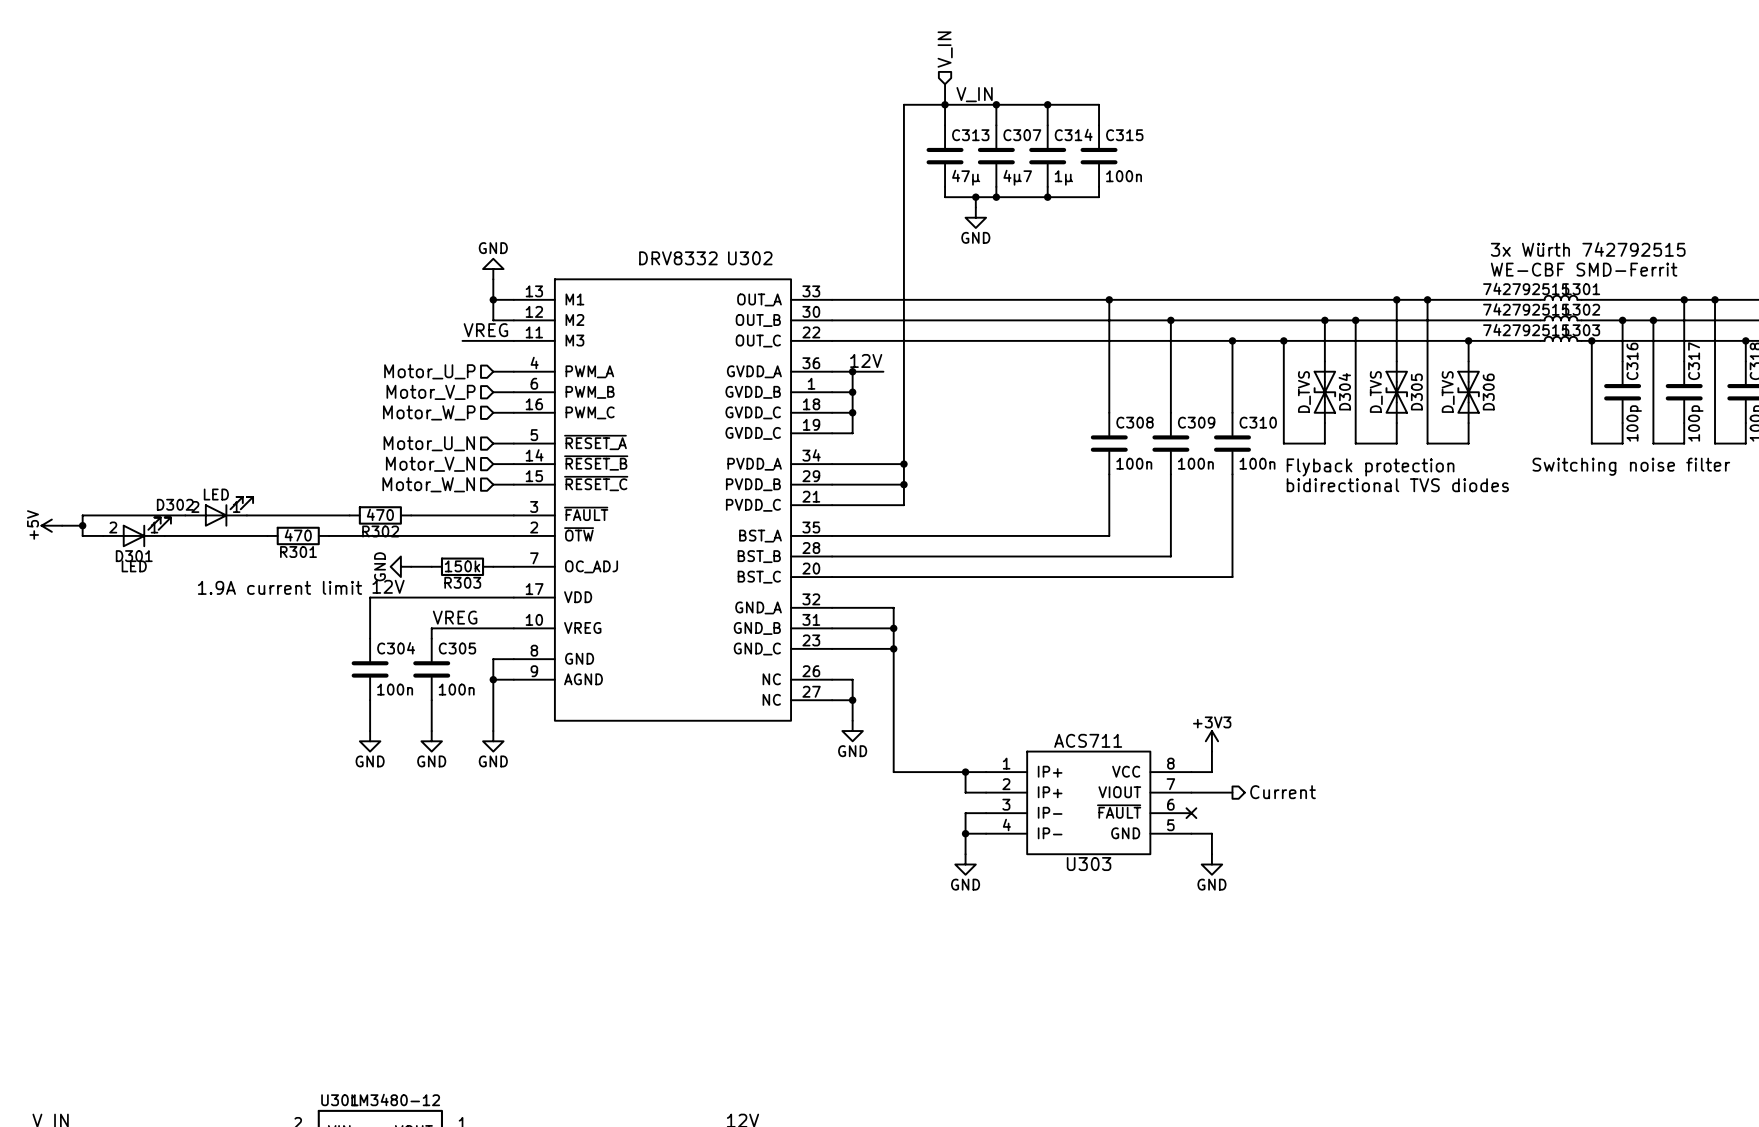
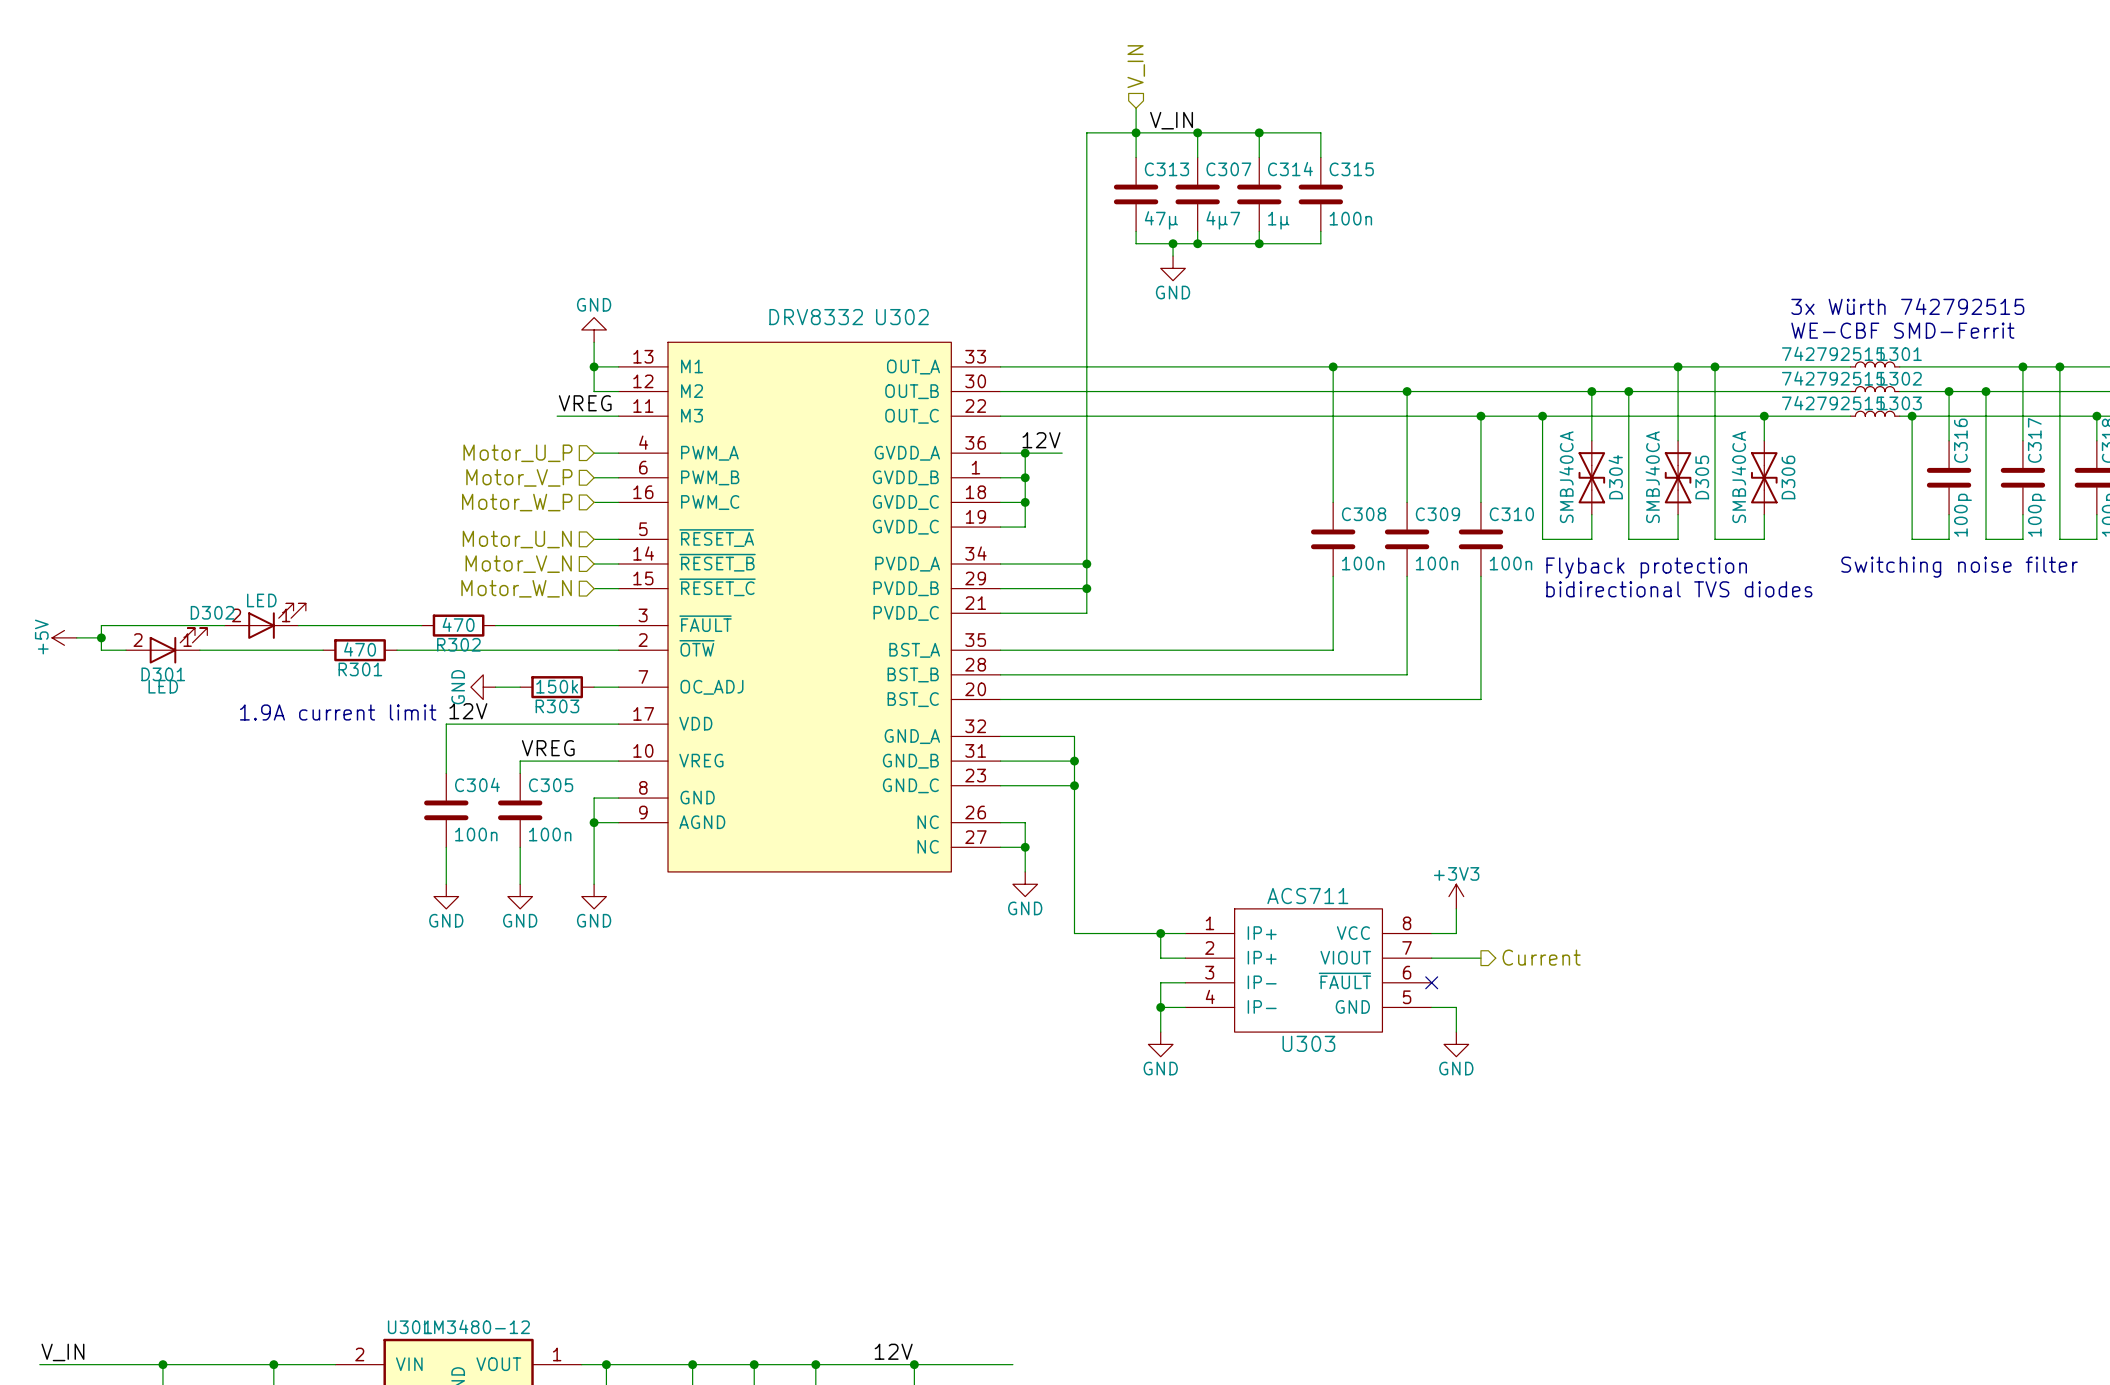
D304 value: D_TVS (1304, 392) -> SMBJ40CA (1566, 477)
D305 value: D_TVS (1376, 392) -> SMBJ40CA (1652, 477)
D306 value: D_TVS (1448, 392) -> SMBJ40CA (1738, 477)

